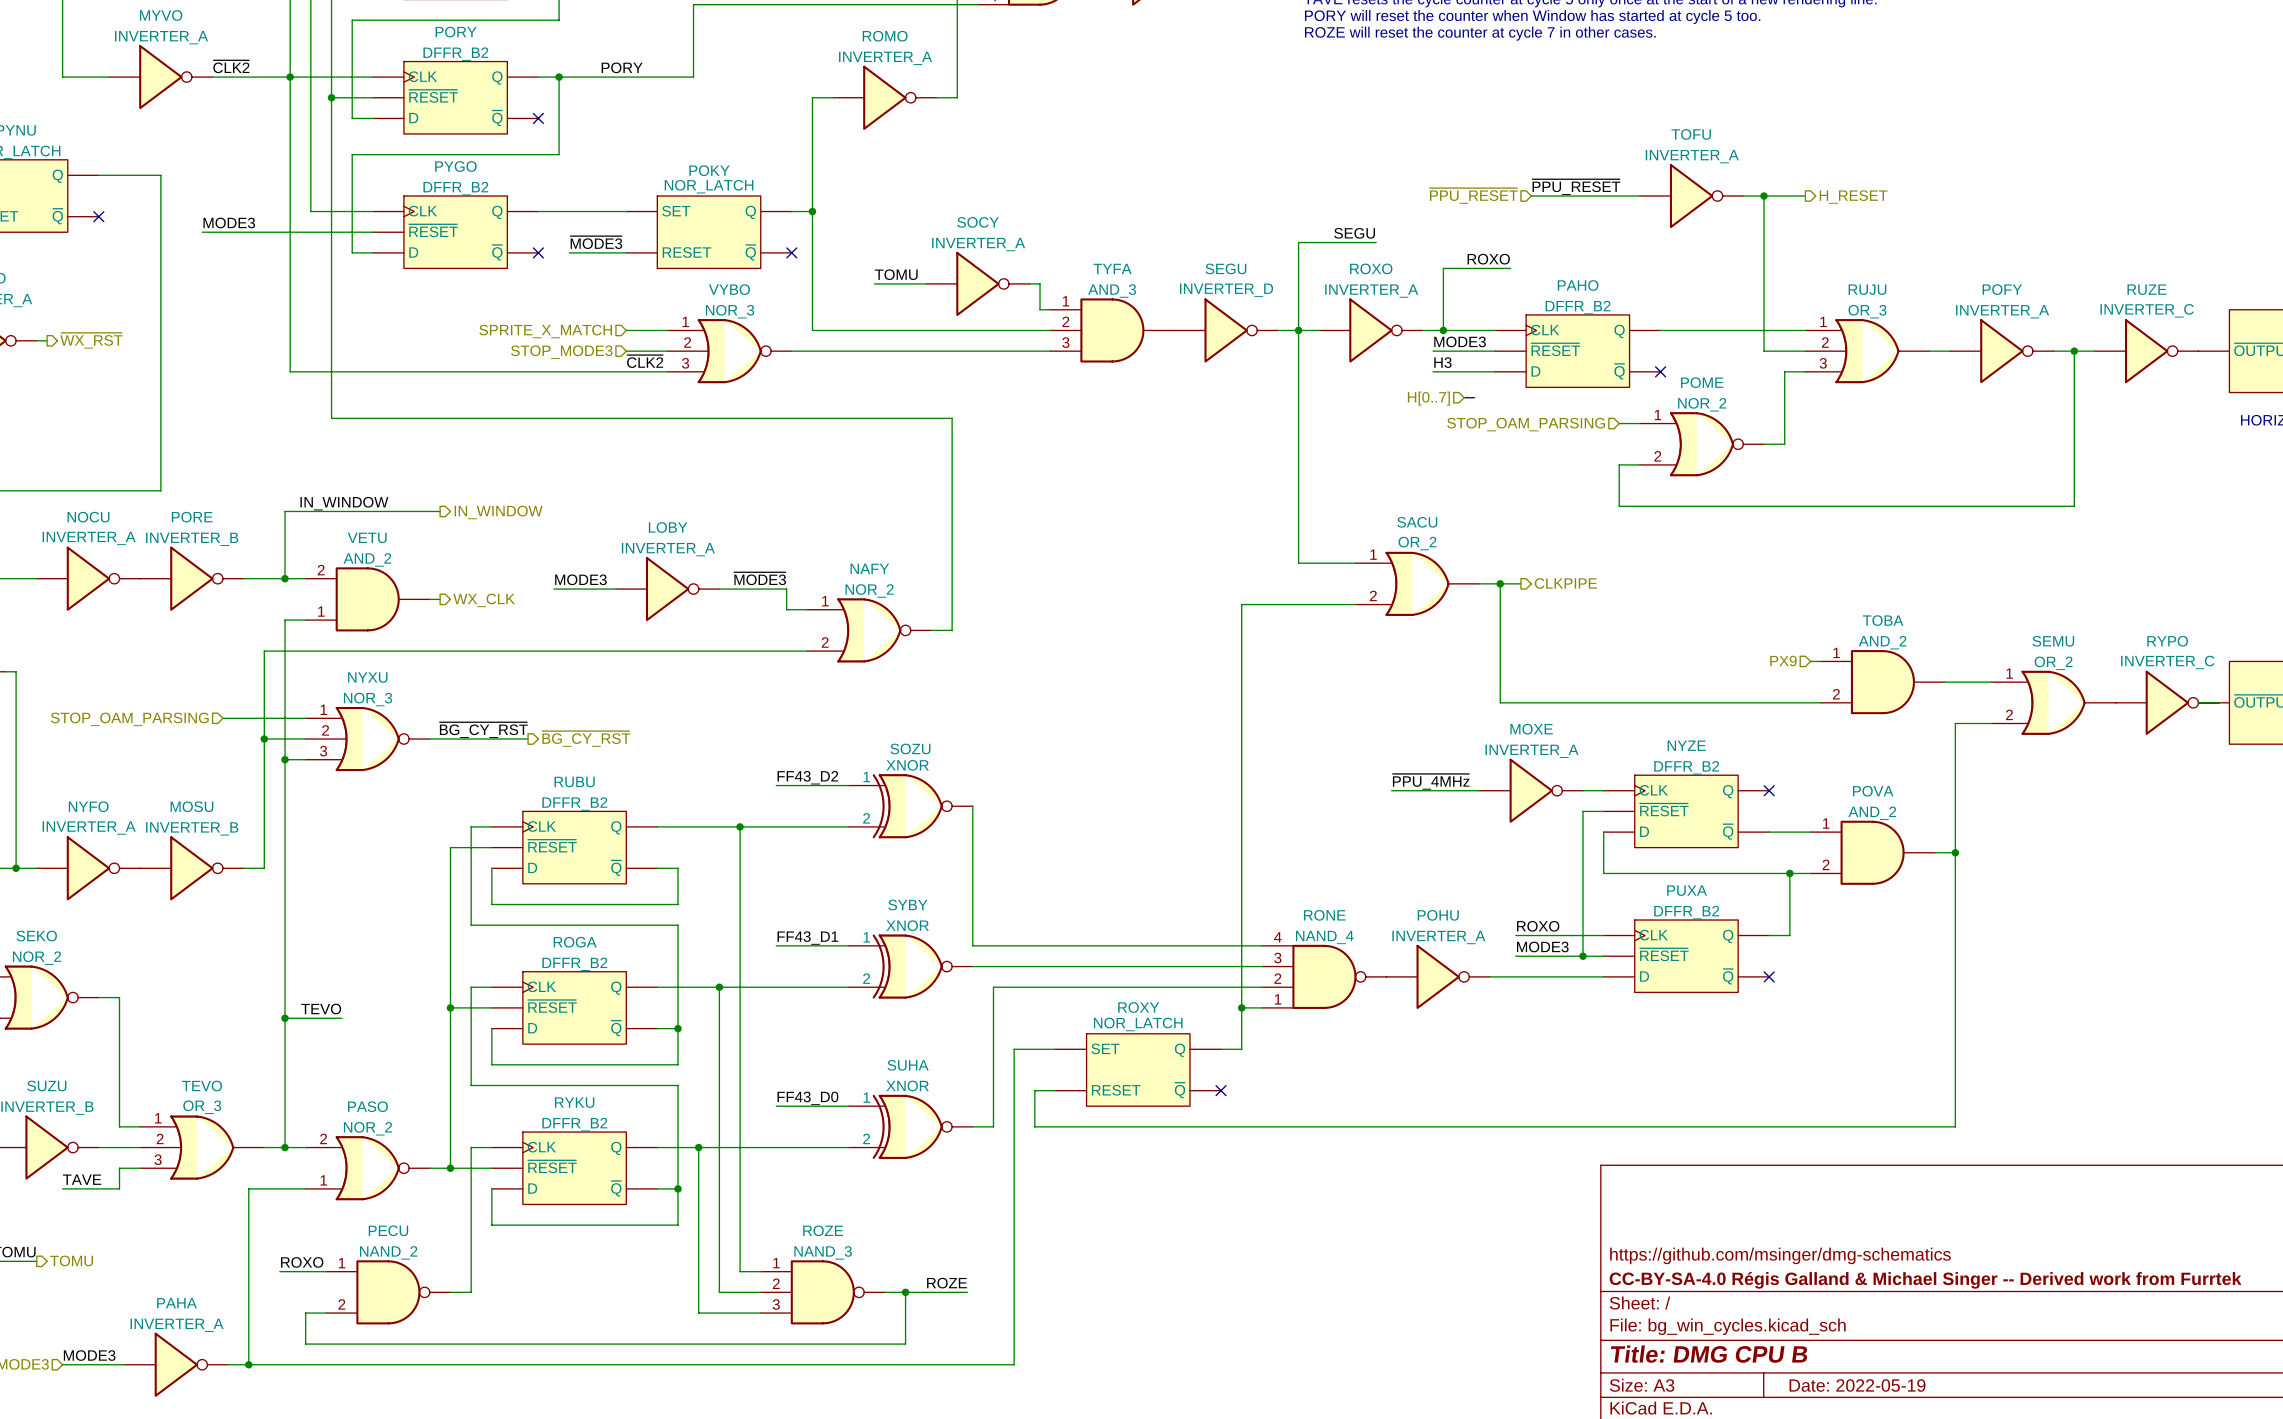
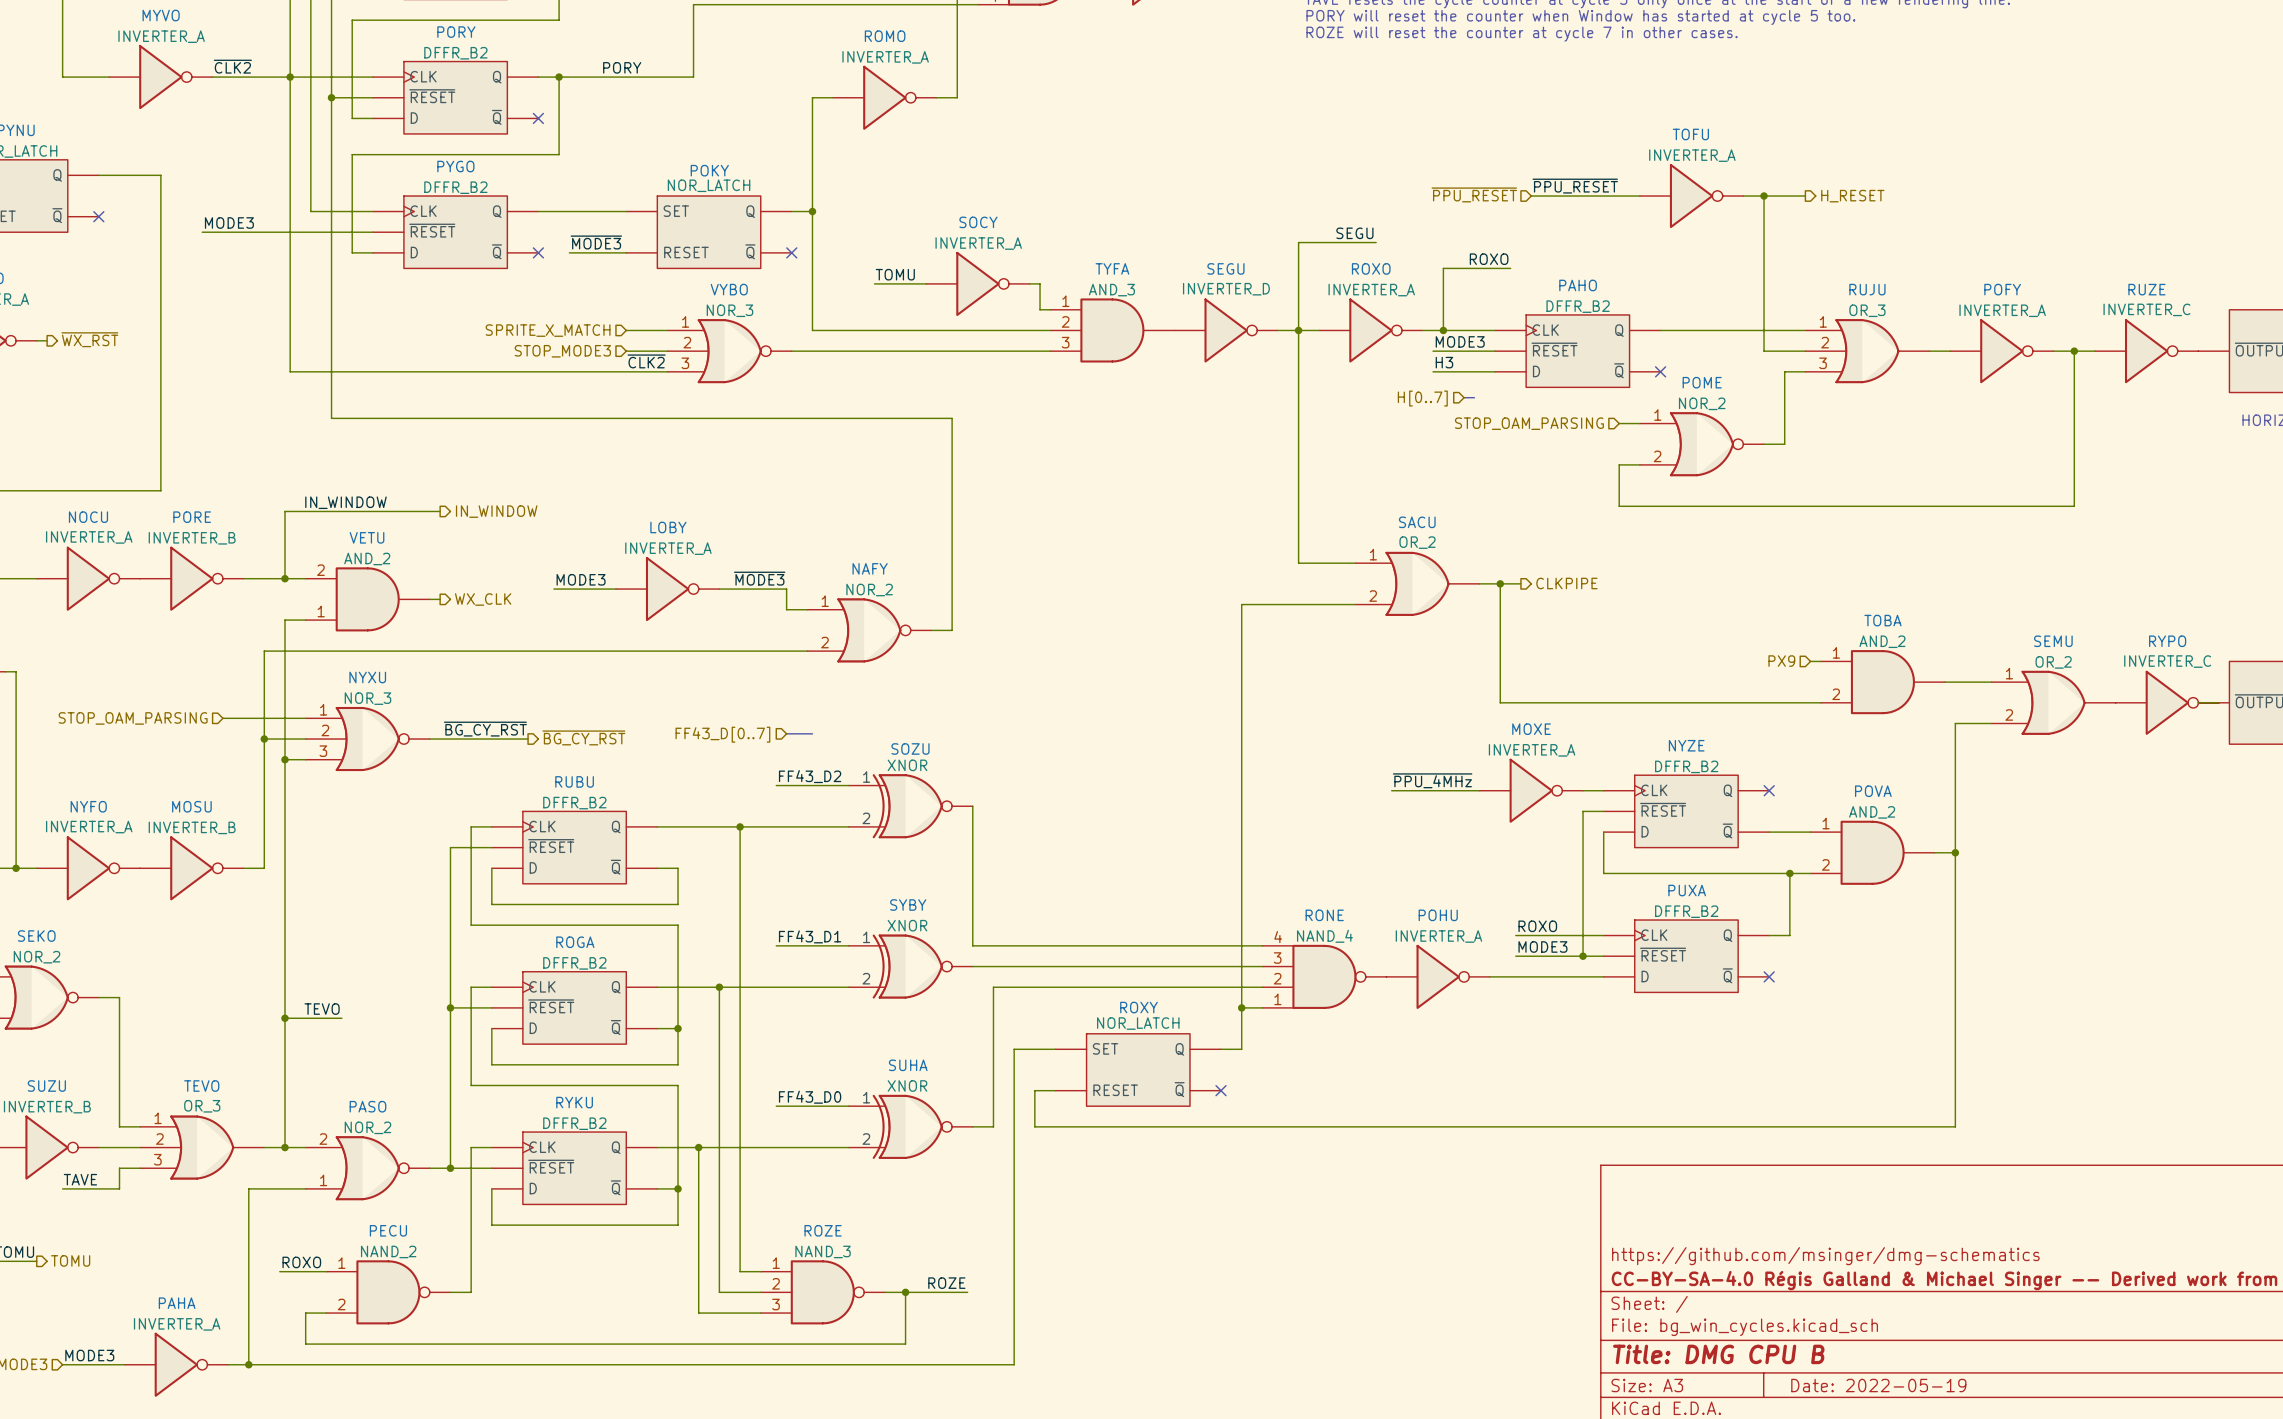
bus: none -> (786, 733) (812, 733)
hierarchical label: none -> FF43_D[0..7] (722, 734)

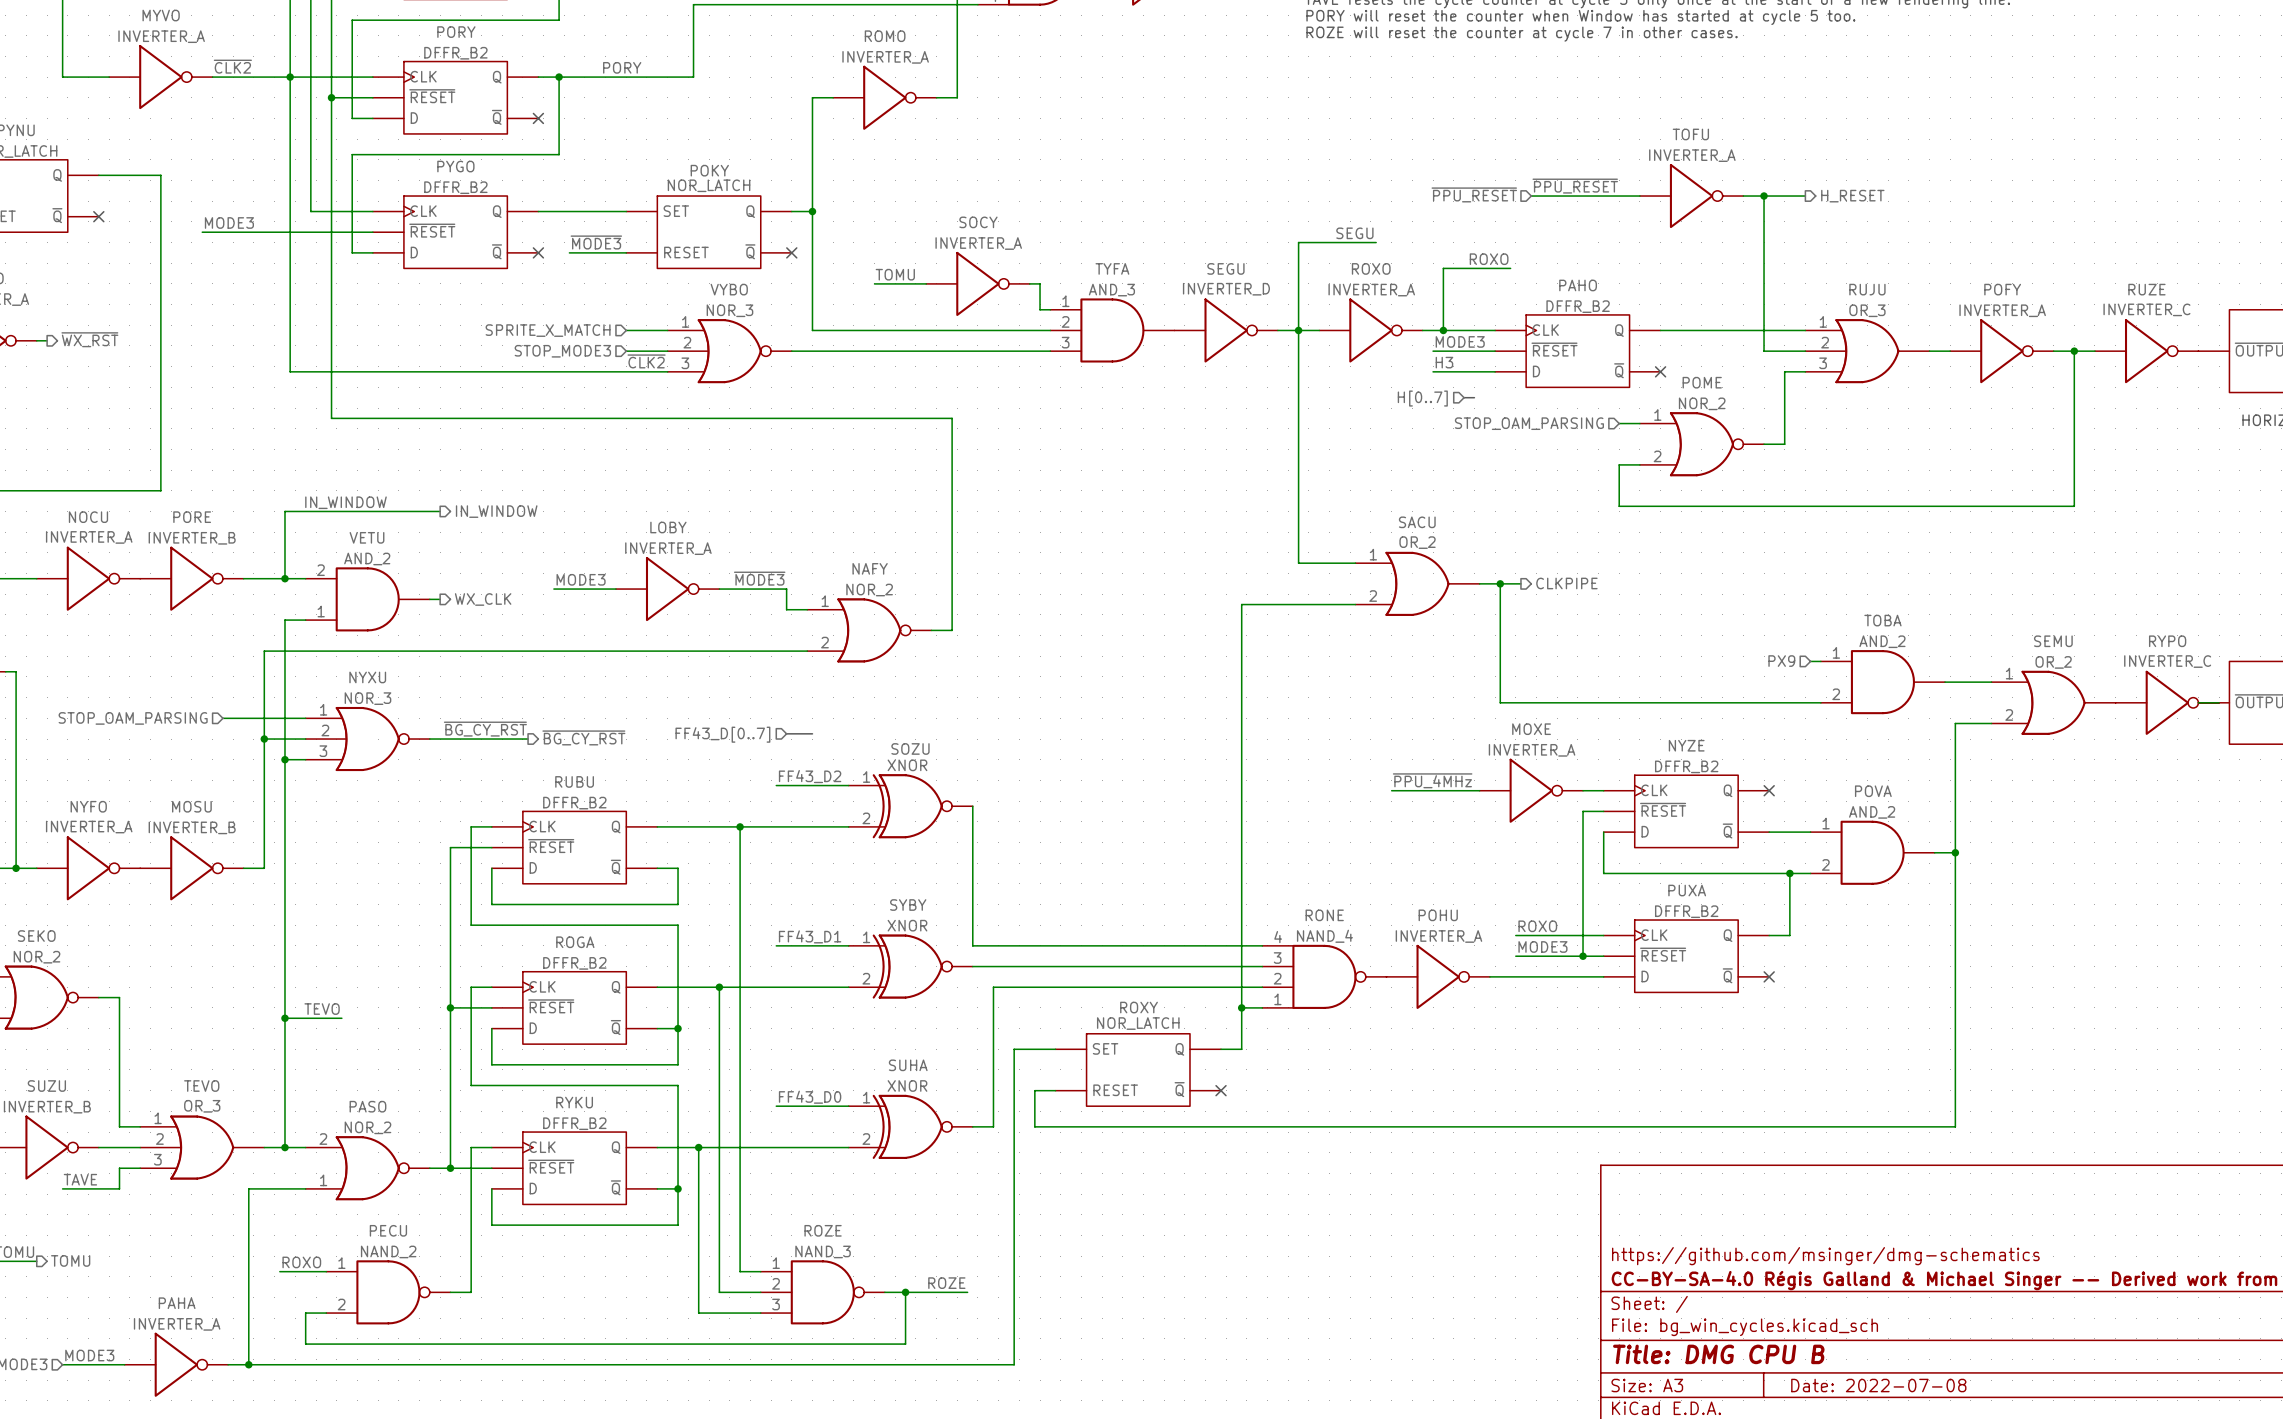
title block: Date: 2022-05-19 (1878, 1385) -> Date: 2022-07-08 (1878, 1385)

